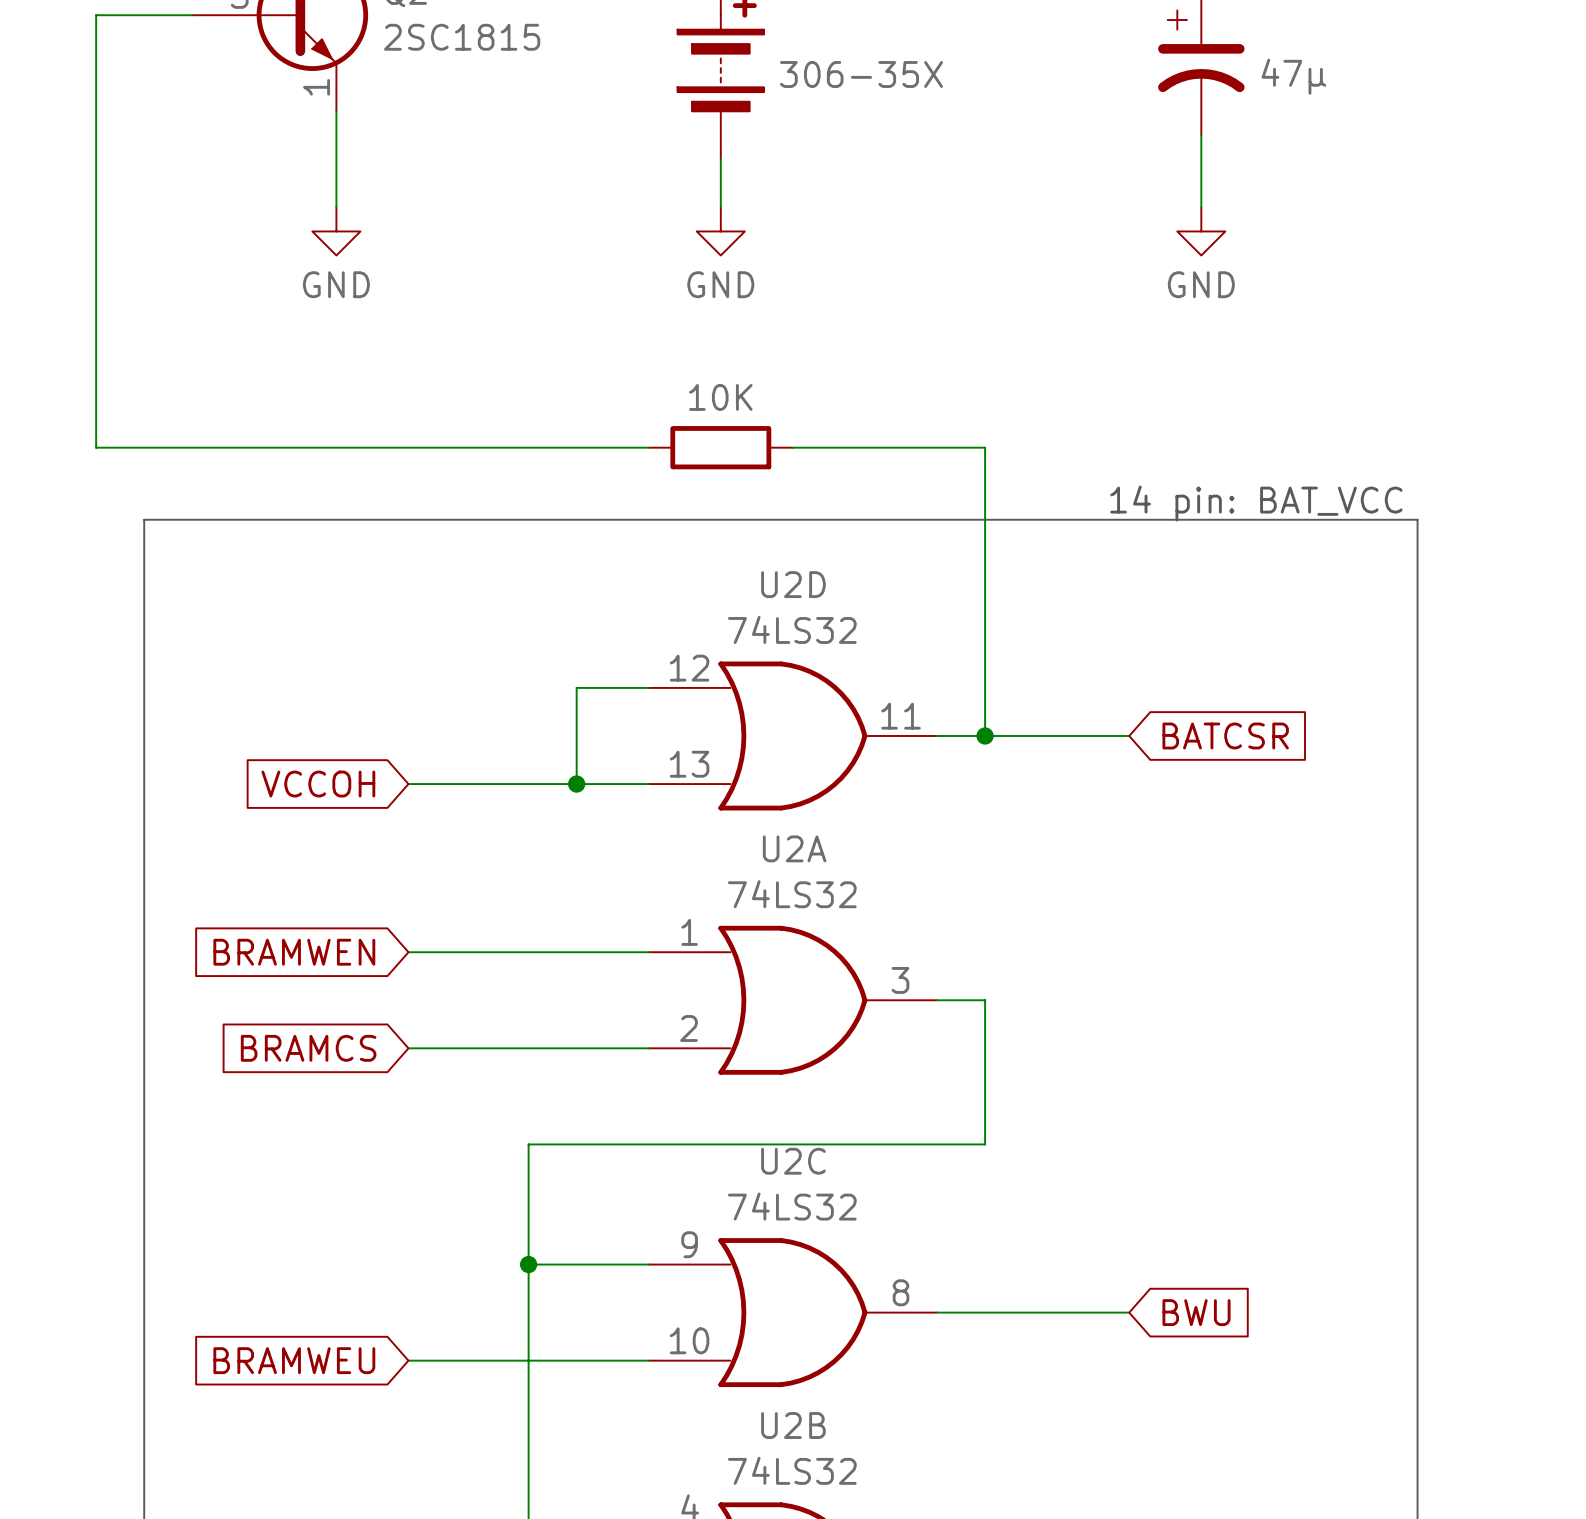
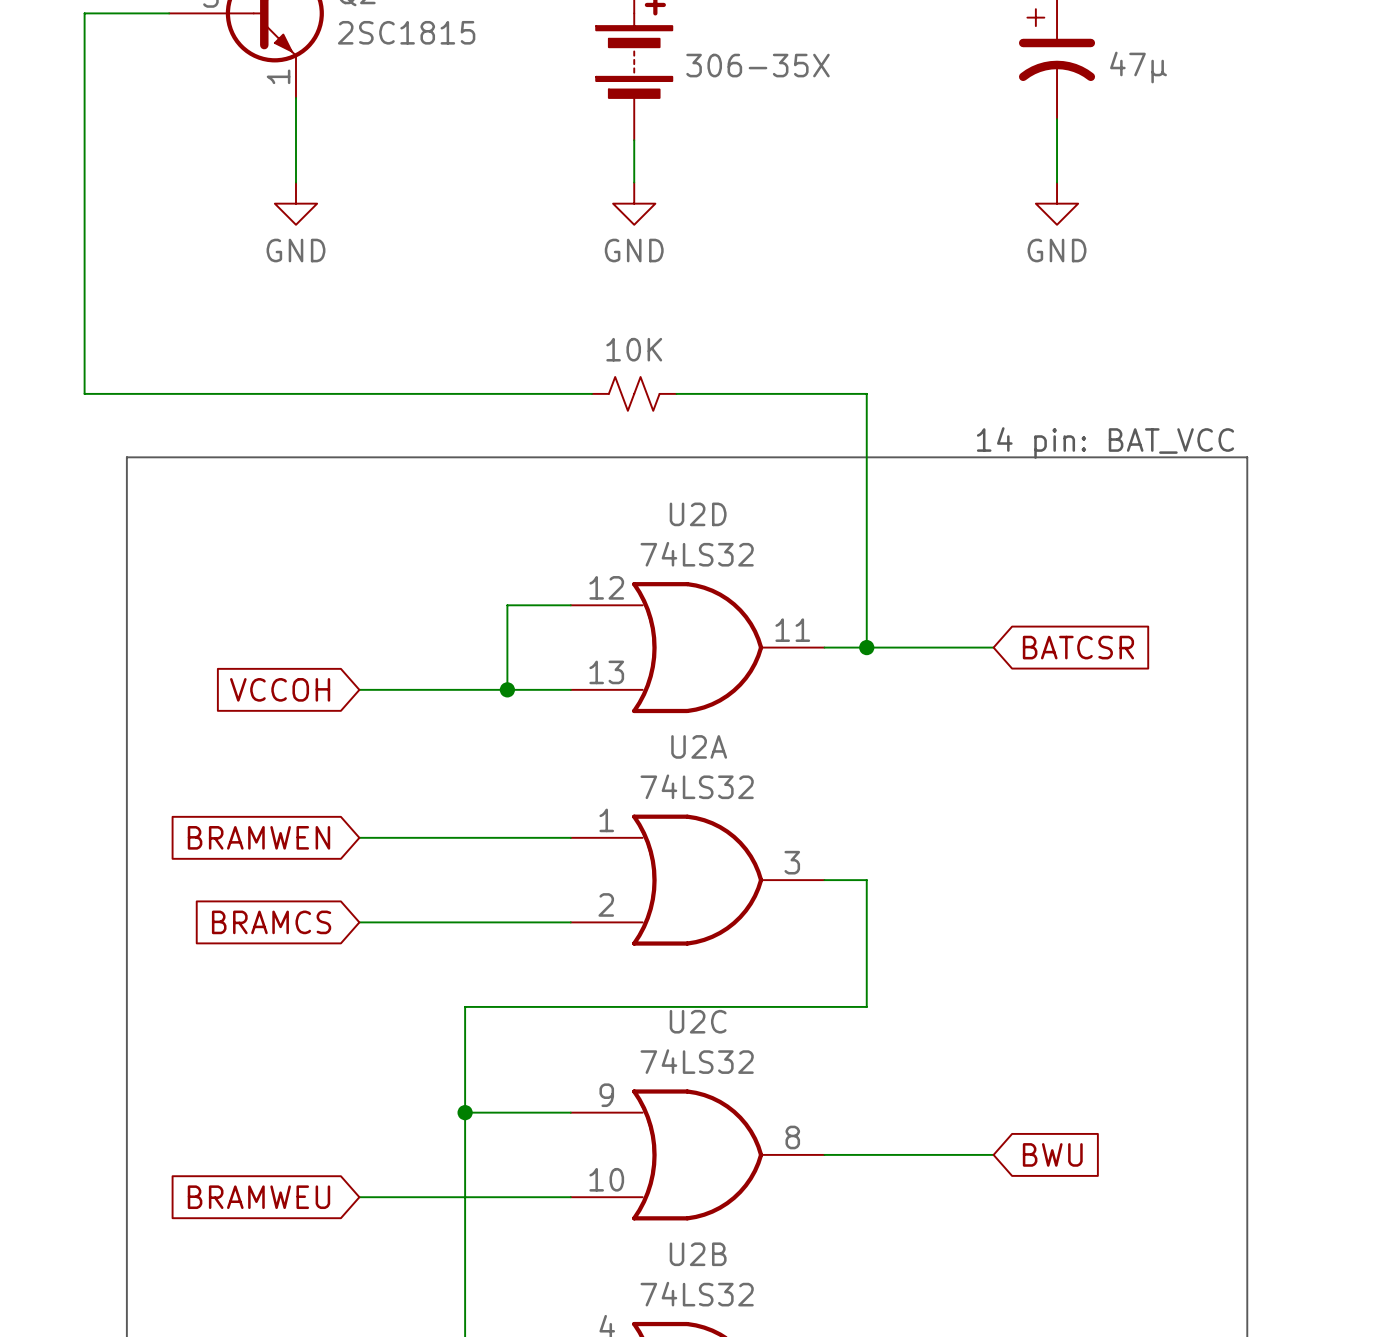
part symbol: [648, 426, 793, 470] -> [591, 376, 677, 411]

